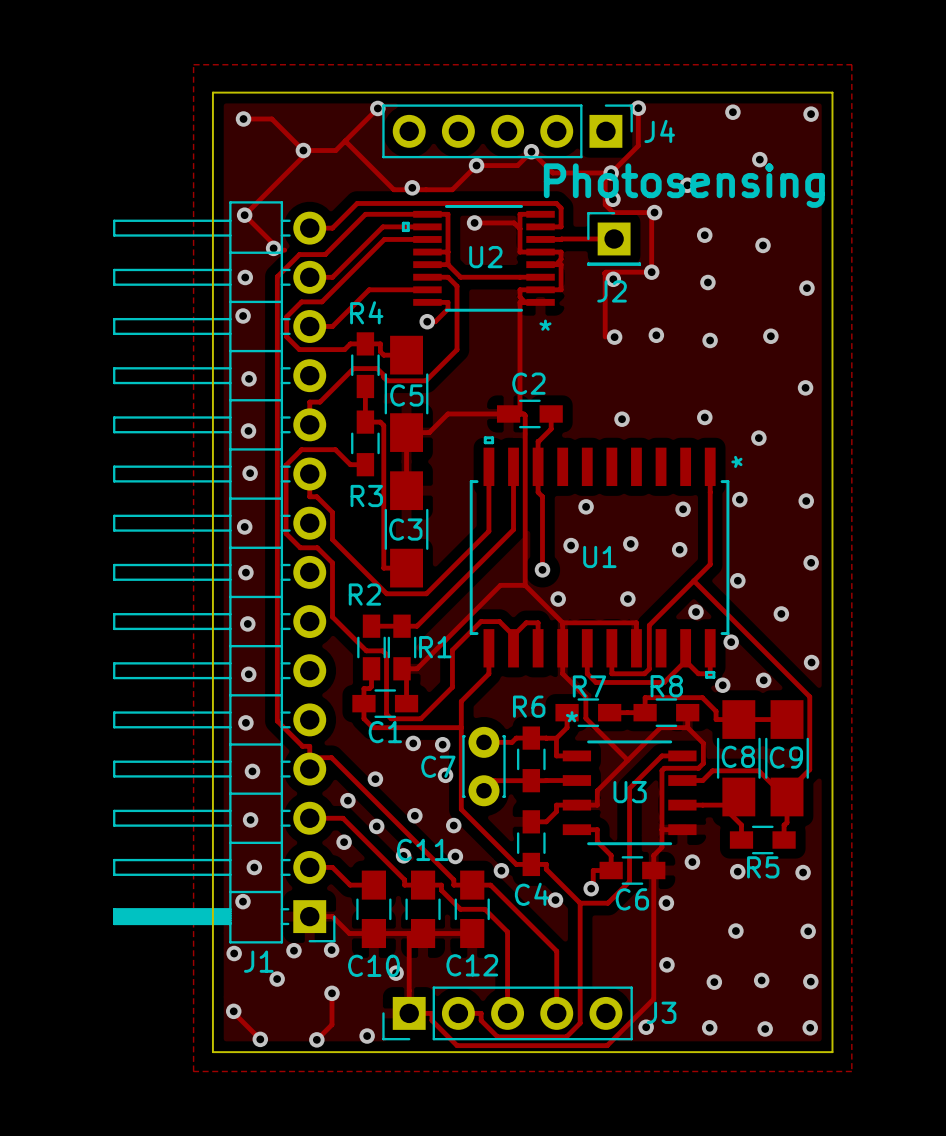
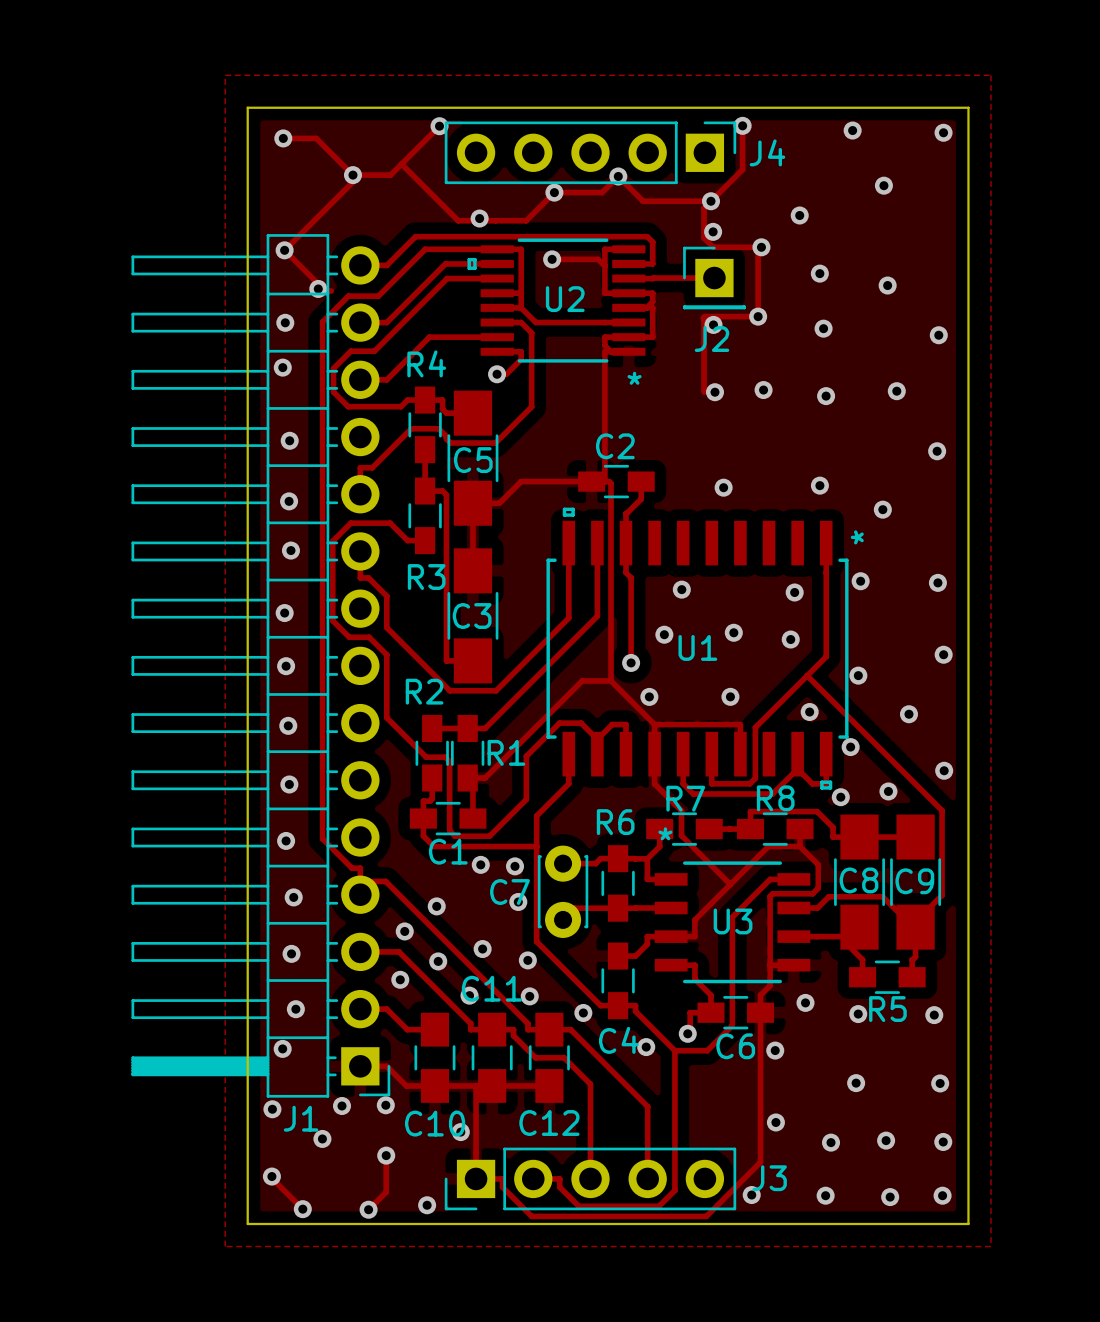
text: Photosensing (684, 185) -> none

